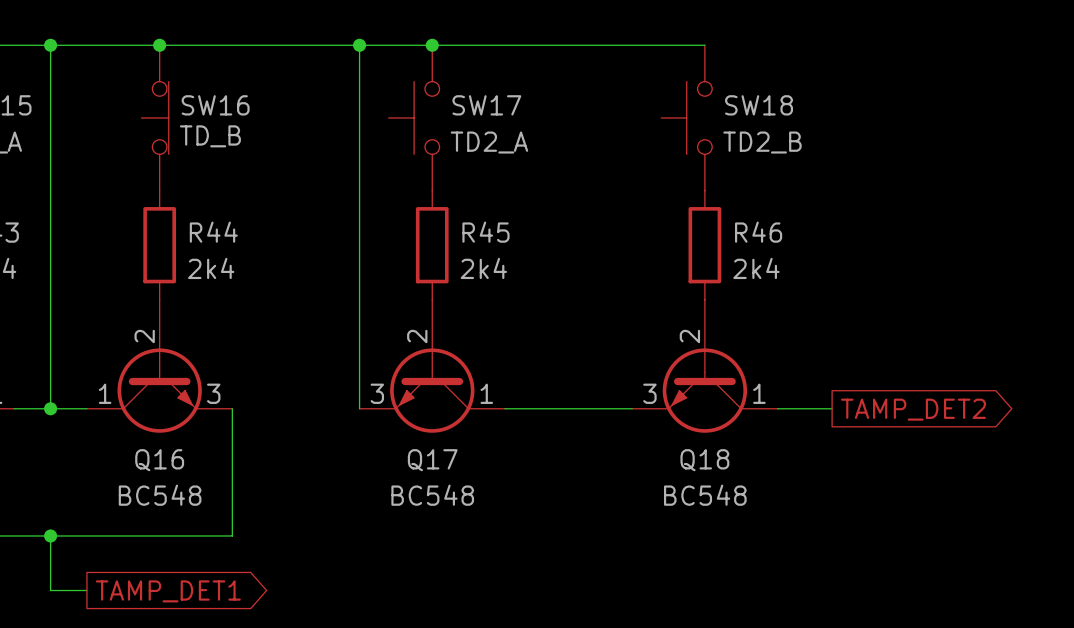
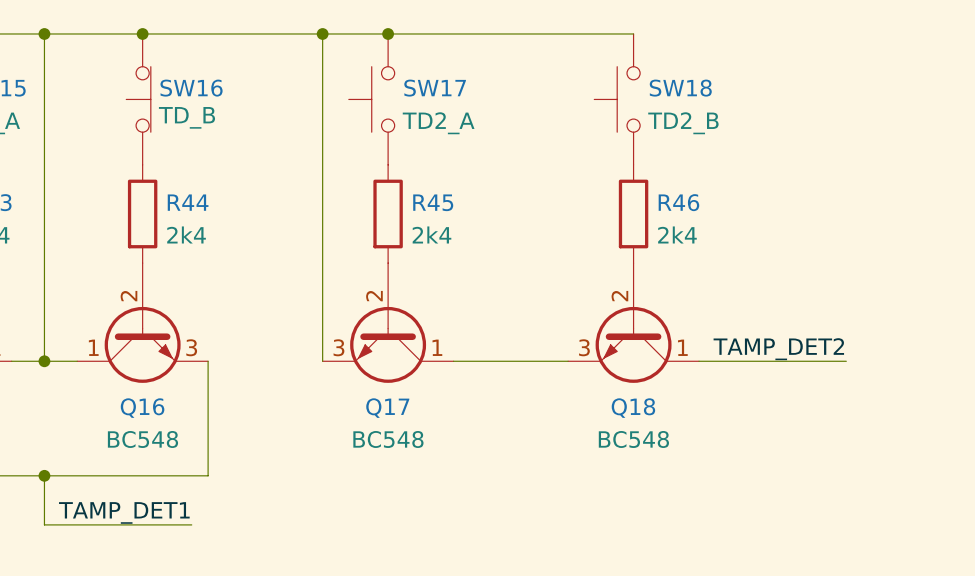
label: none -> TAMP_DET2 (778, 349)
wire: none -> (748, 361) (846, 361)
global label: TAMP_DET2 (913, 409) -> none
label: none -> TAMP_DET1 (124, 512)
wire: none -> (77, 524) (191, 524)
global label: TAMP_DET1 (168, 591) -> none

